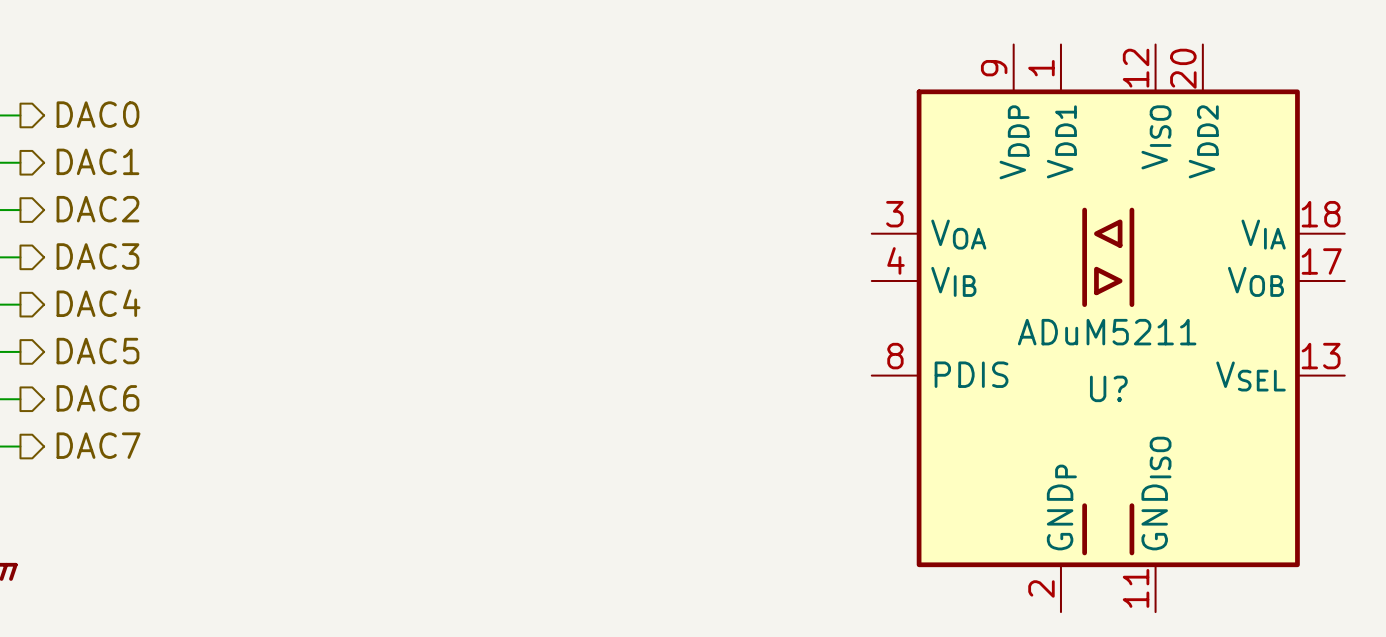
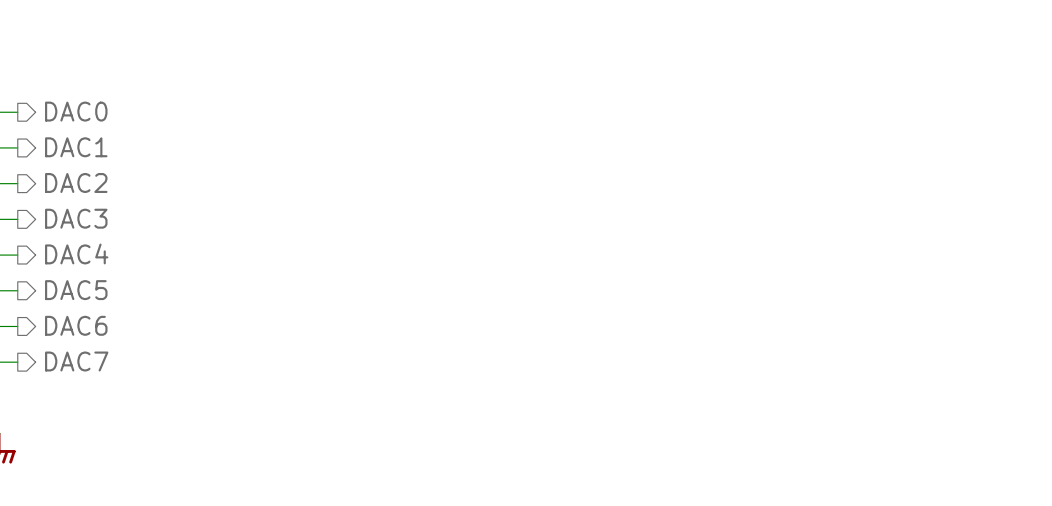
U?: ADuM5211 (1108, 328) -> none

